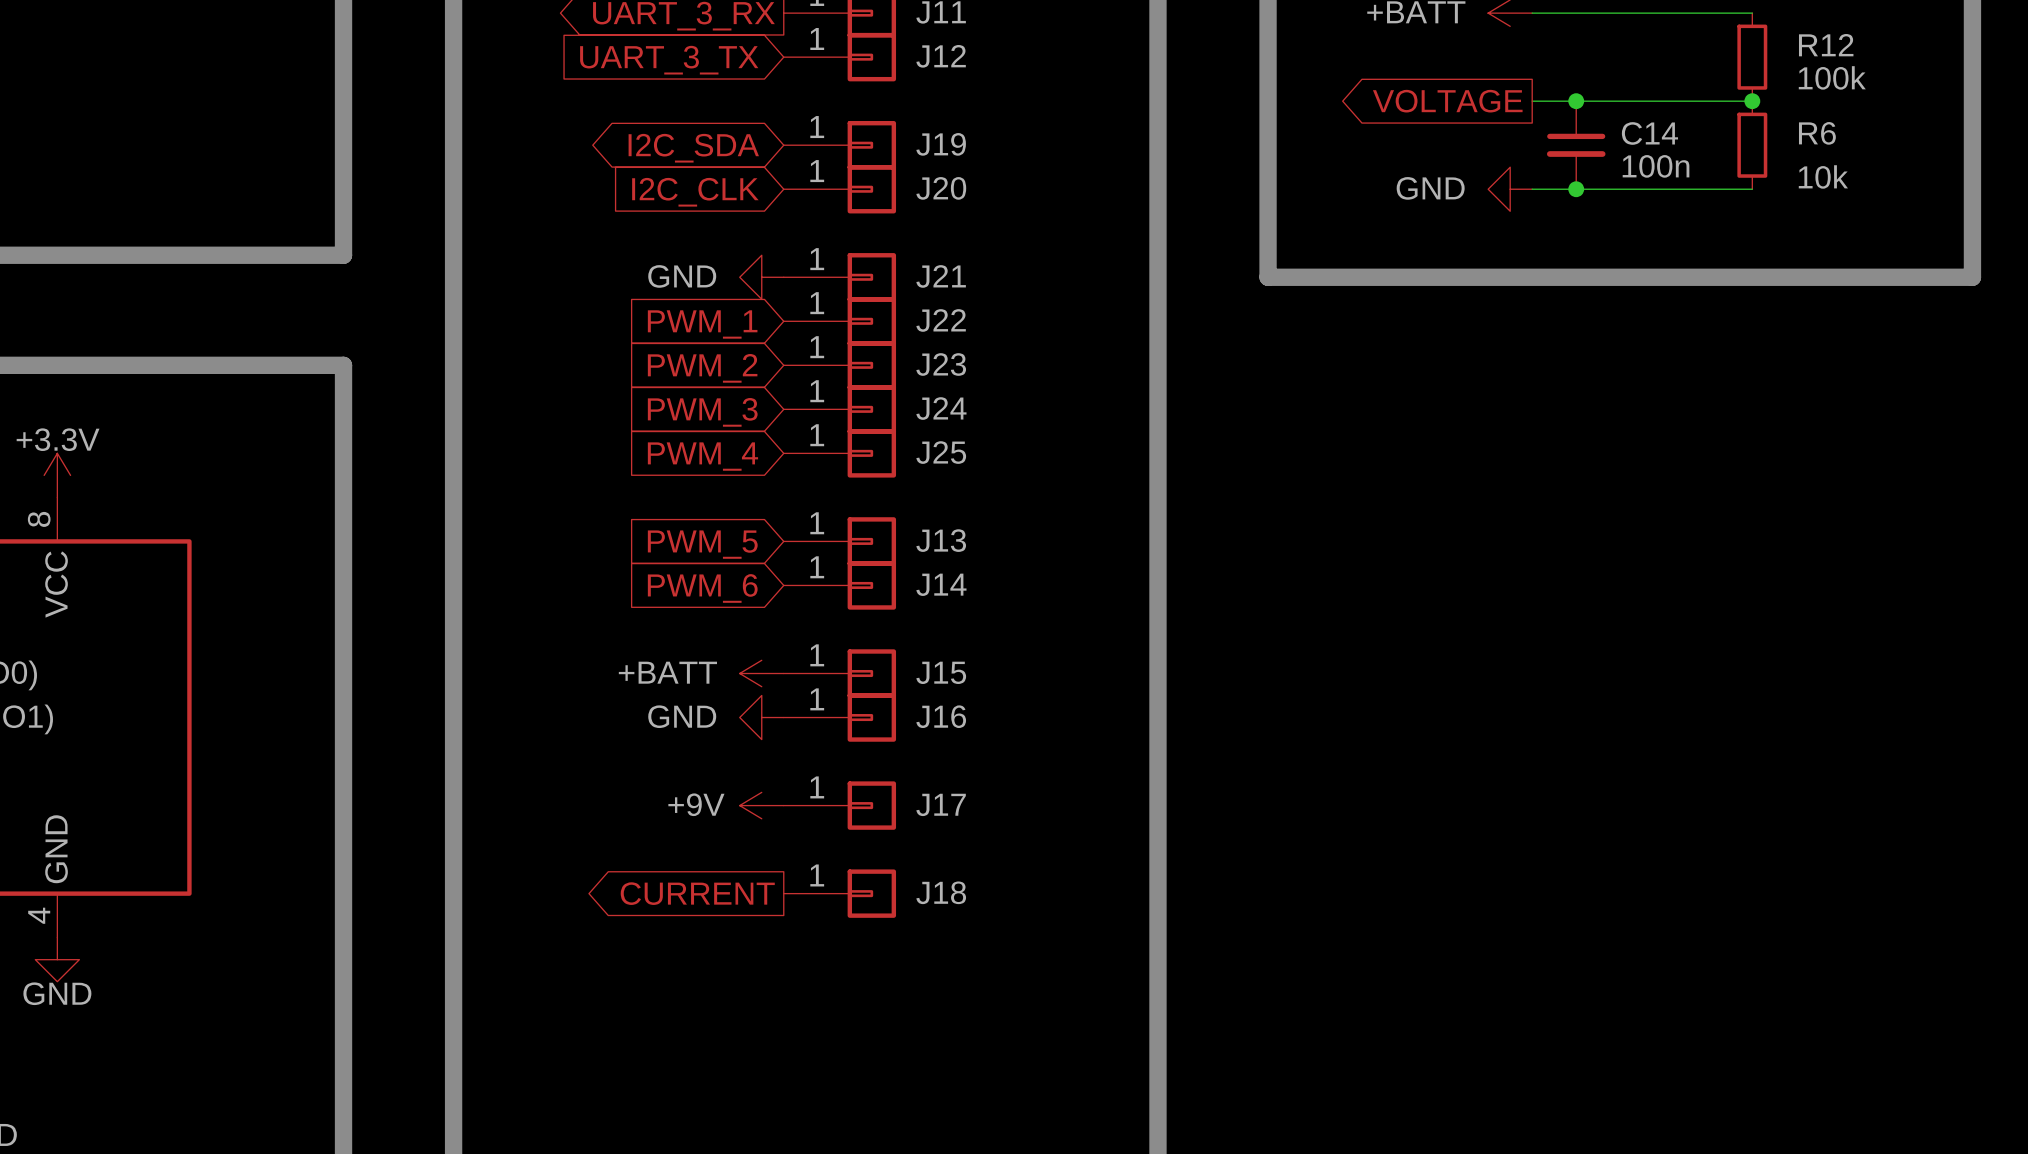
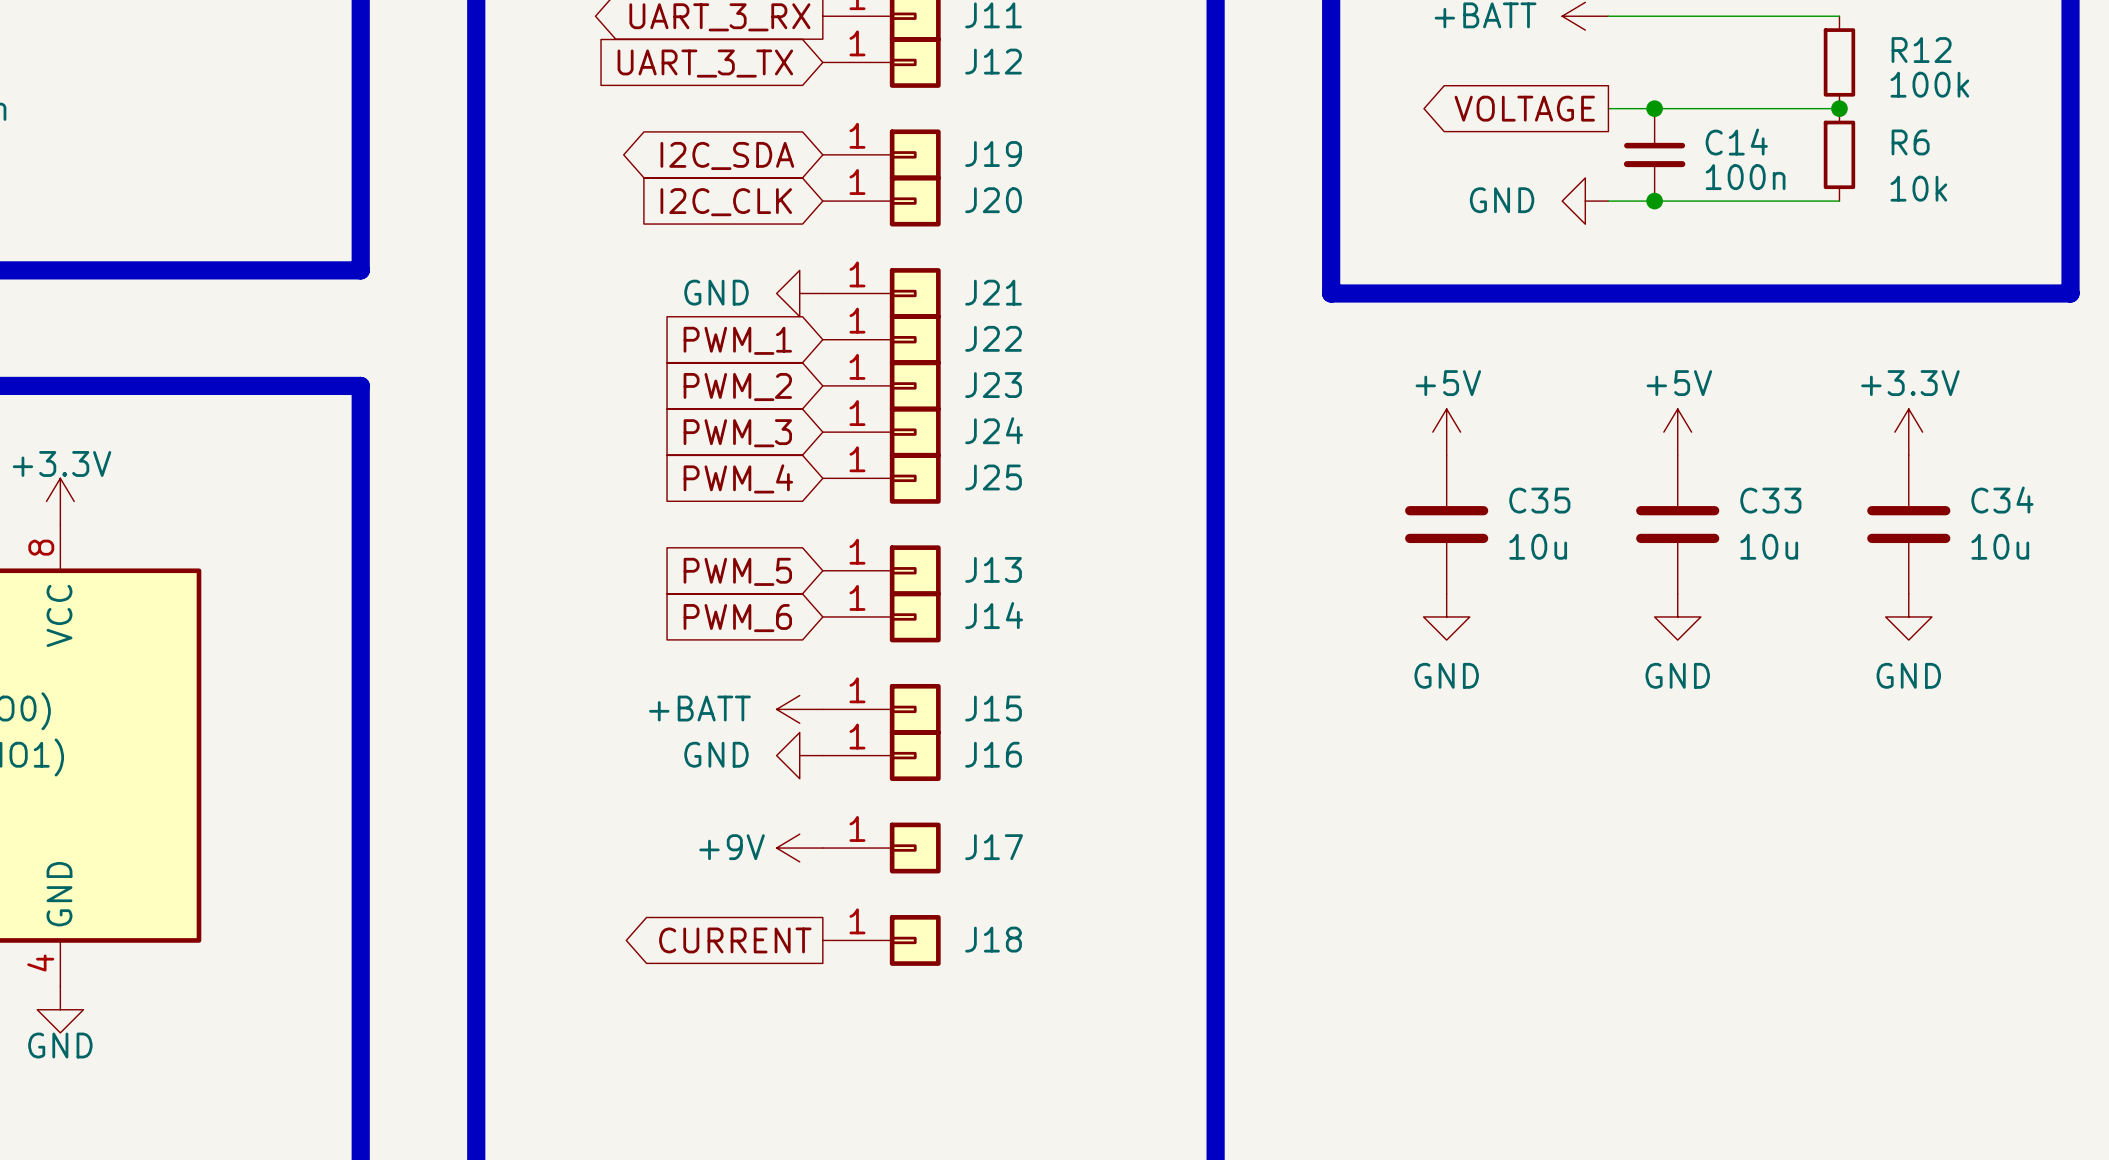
power symbol: none -> +5V (1446, 432)
power symbol: none -> +5V (1677, 432)
power symbol: none -> +3.3V (1908, 432)
C35: none -> 10u (1446, 524)
C33: none -> 10u (1677, 524)
C34: none -> 10u (1908, 524)
power symbol: none -> GND (1446, 616)
power symbol: none -> GND (1677, 616)
power symbol: none -> GND (1908, 616)

